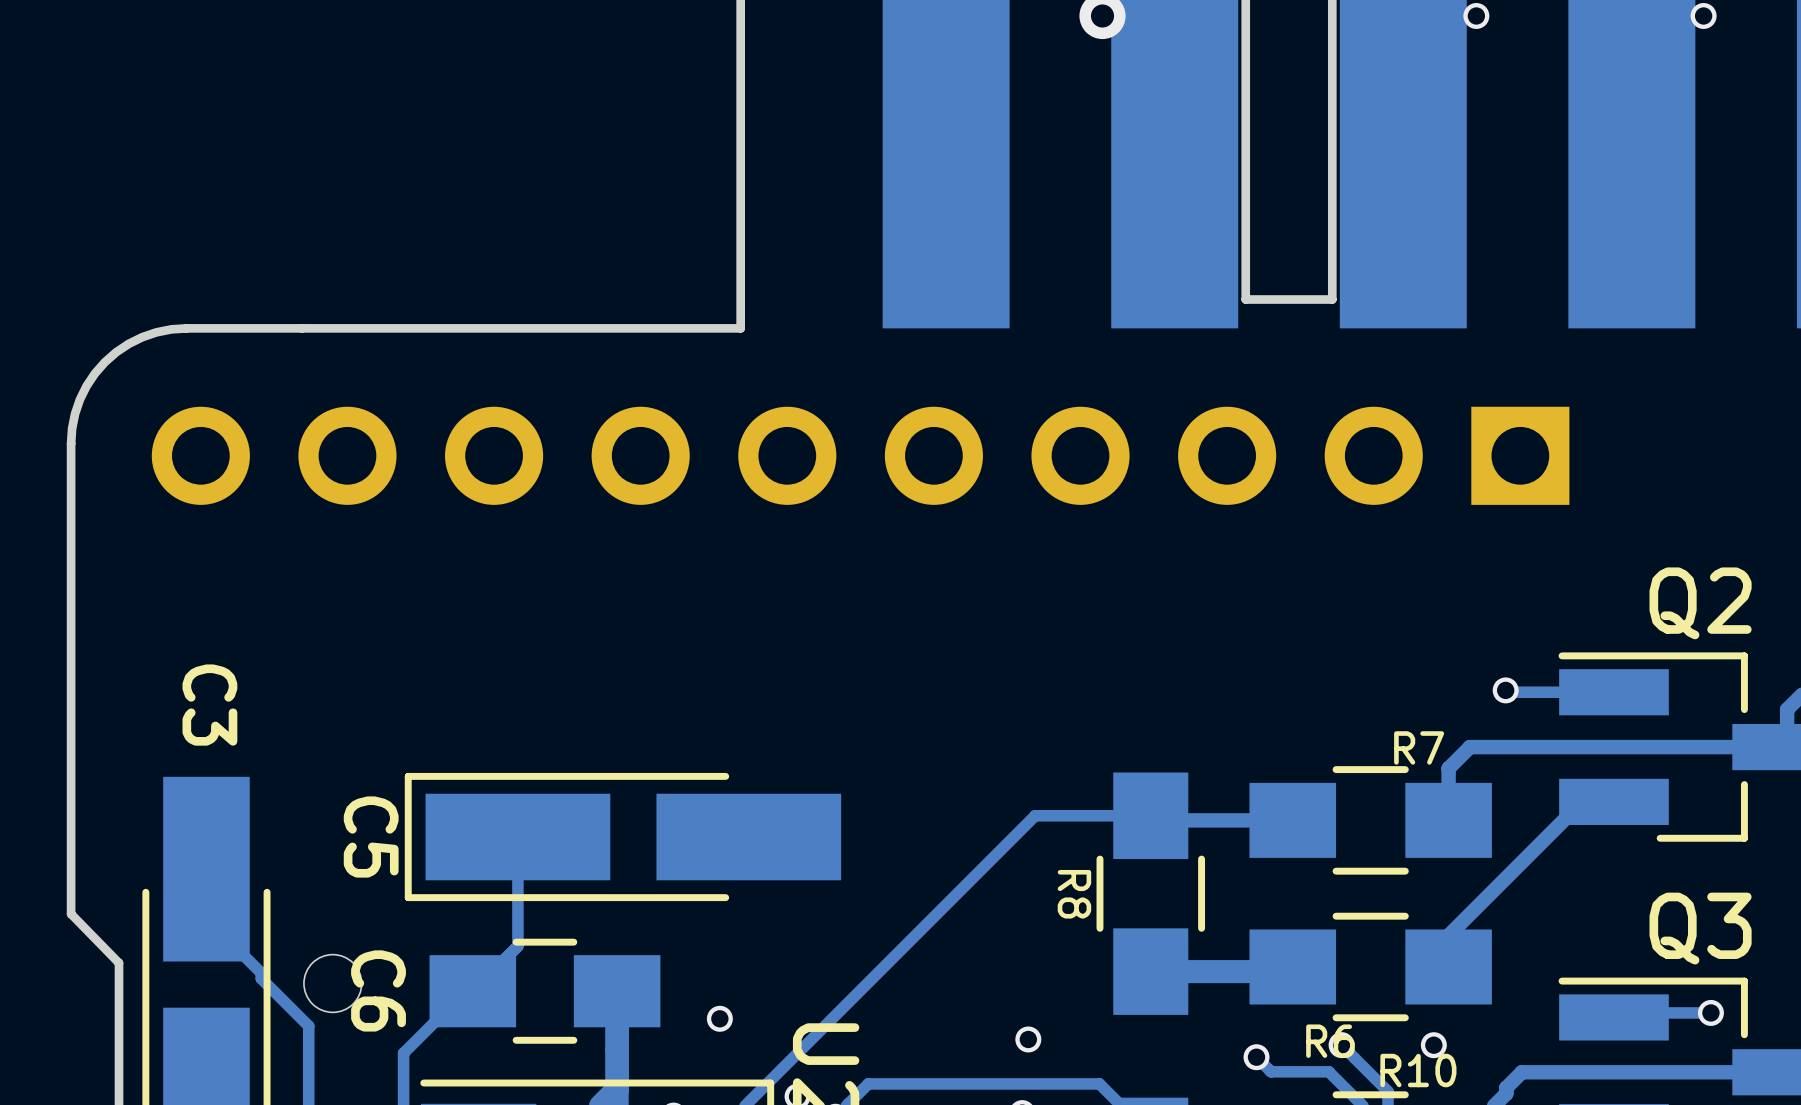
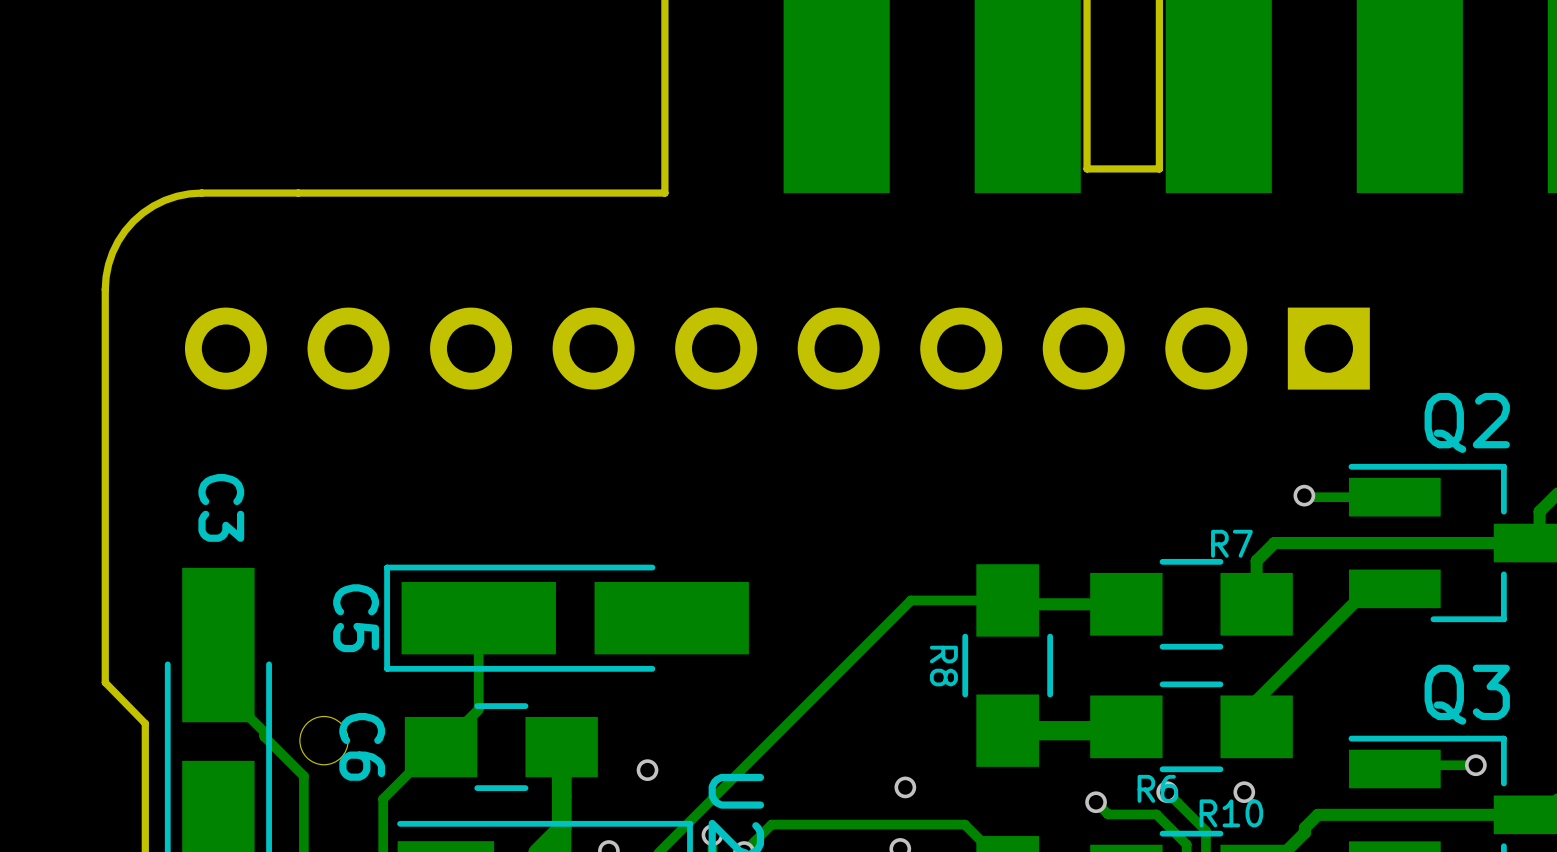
part position: (860, 455) -> (777, 348)

